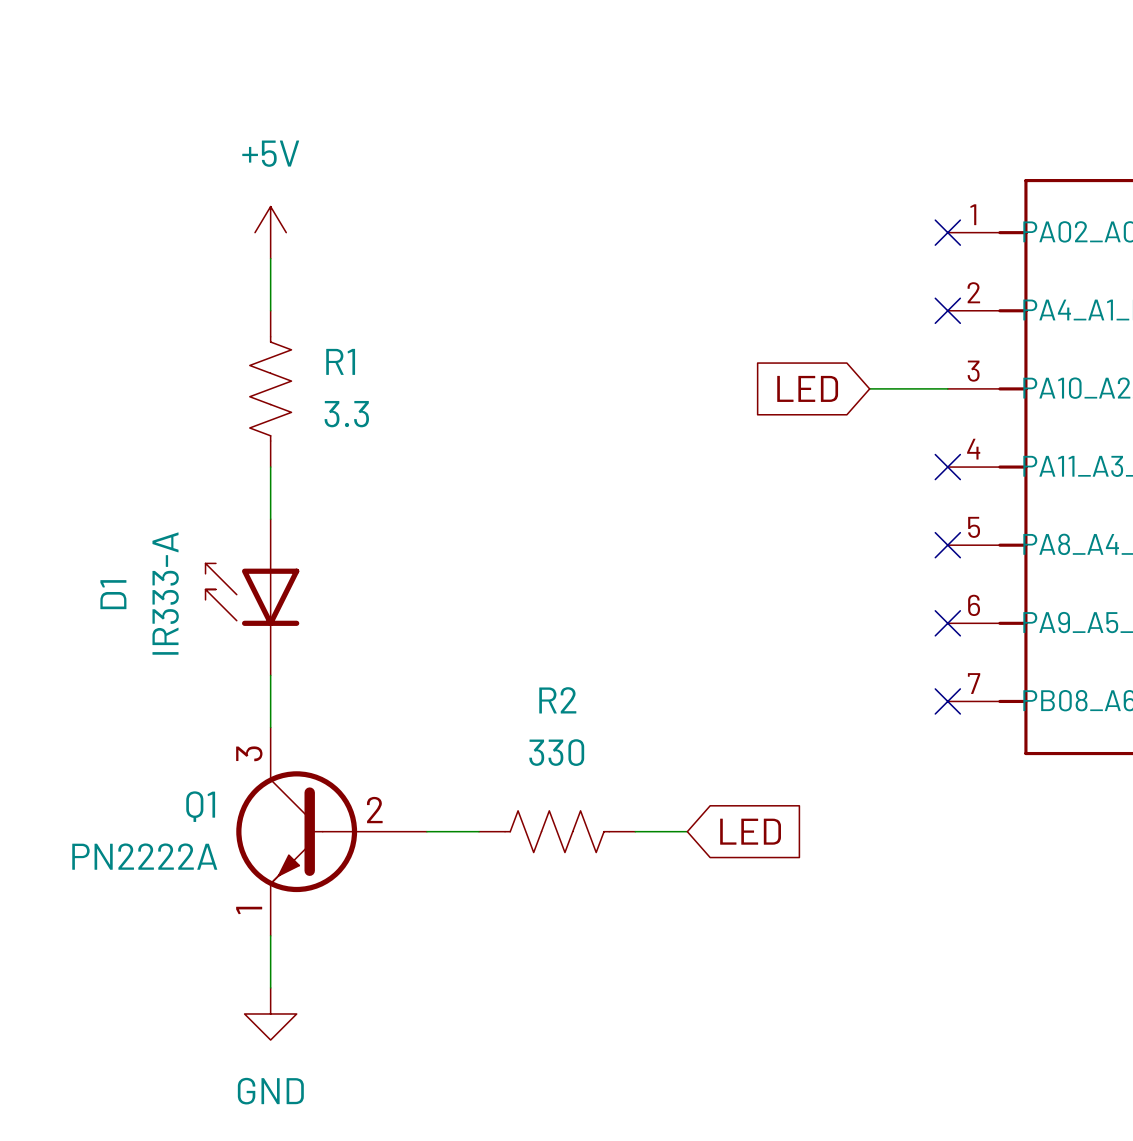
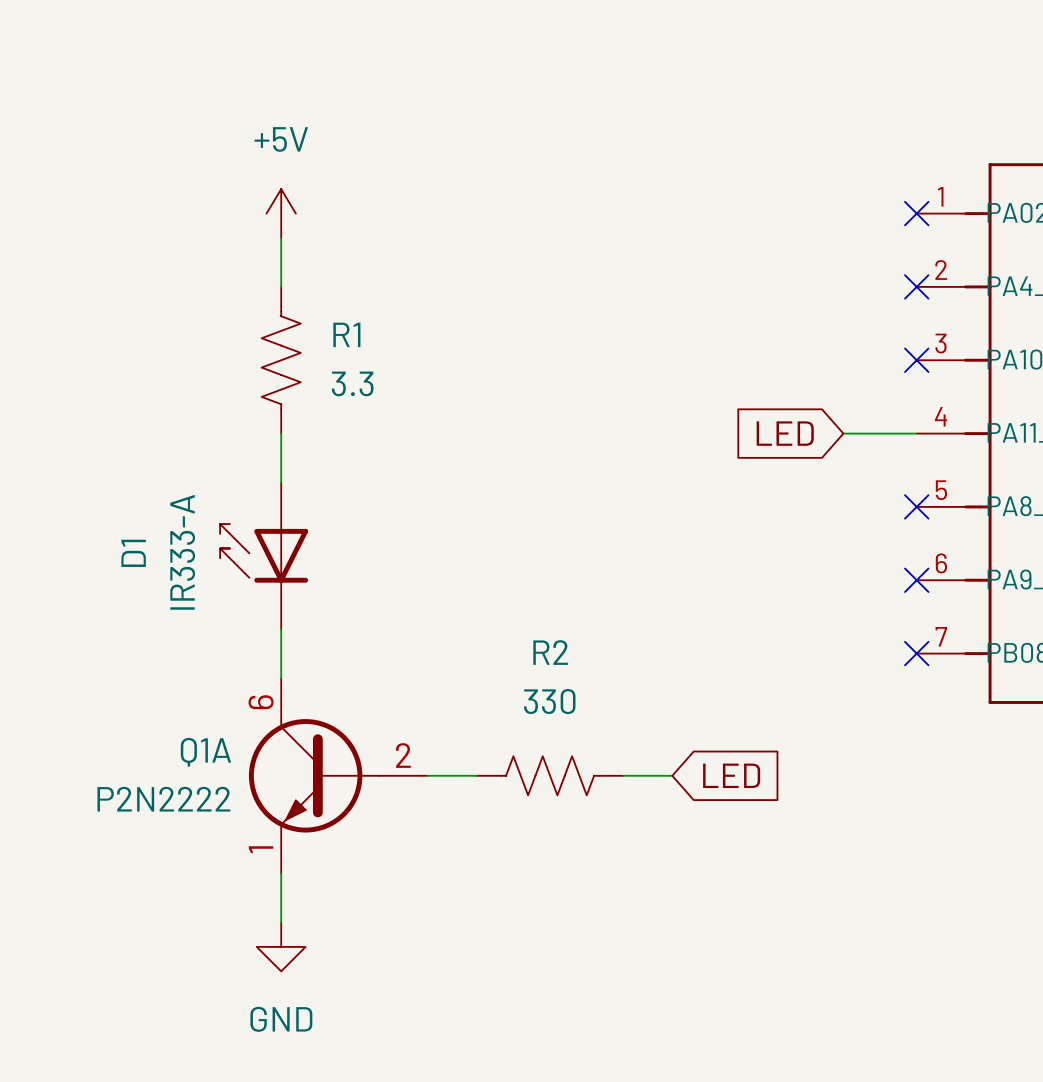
global label position: LED (807, 388) -> LED (785, 433)
wire: (869, 388) (947, 388) -> (843, 433) (916, 433)
no-connect mark position: (947, 467) -> (916, 360)
Q1: PN2222A (331, 831) -> none
Q1A: none -> P2N2222 (338, 775)

